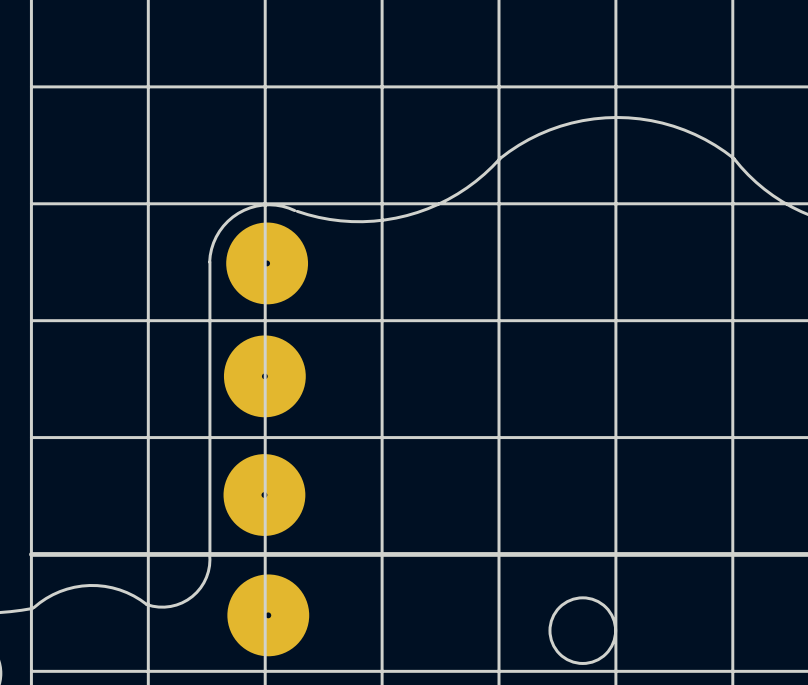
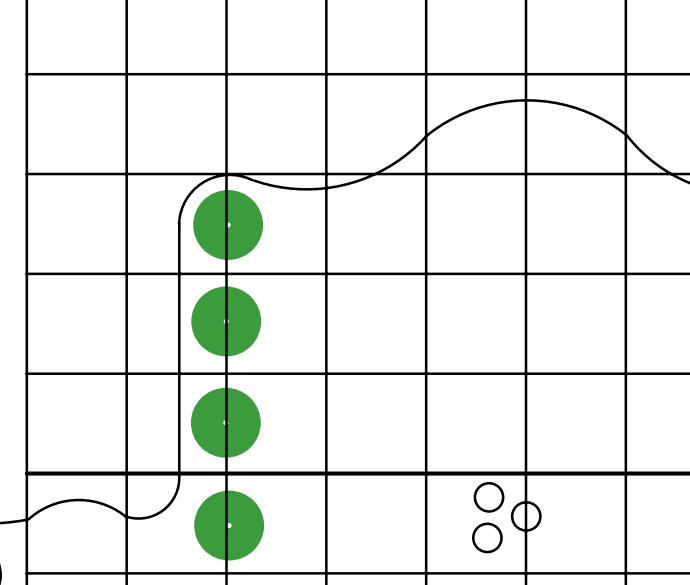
round board edge: none -> [473, 481, 505, 513]
round board edge: none -> [510, 501, 542, 532]
round board edge: [548, 596, 618, 665] -> none
round board edge: none -> [472, 522, 503, 554]

